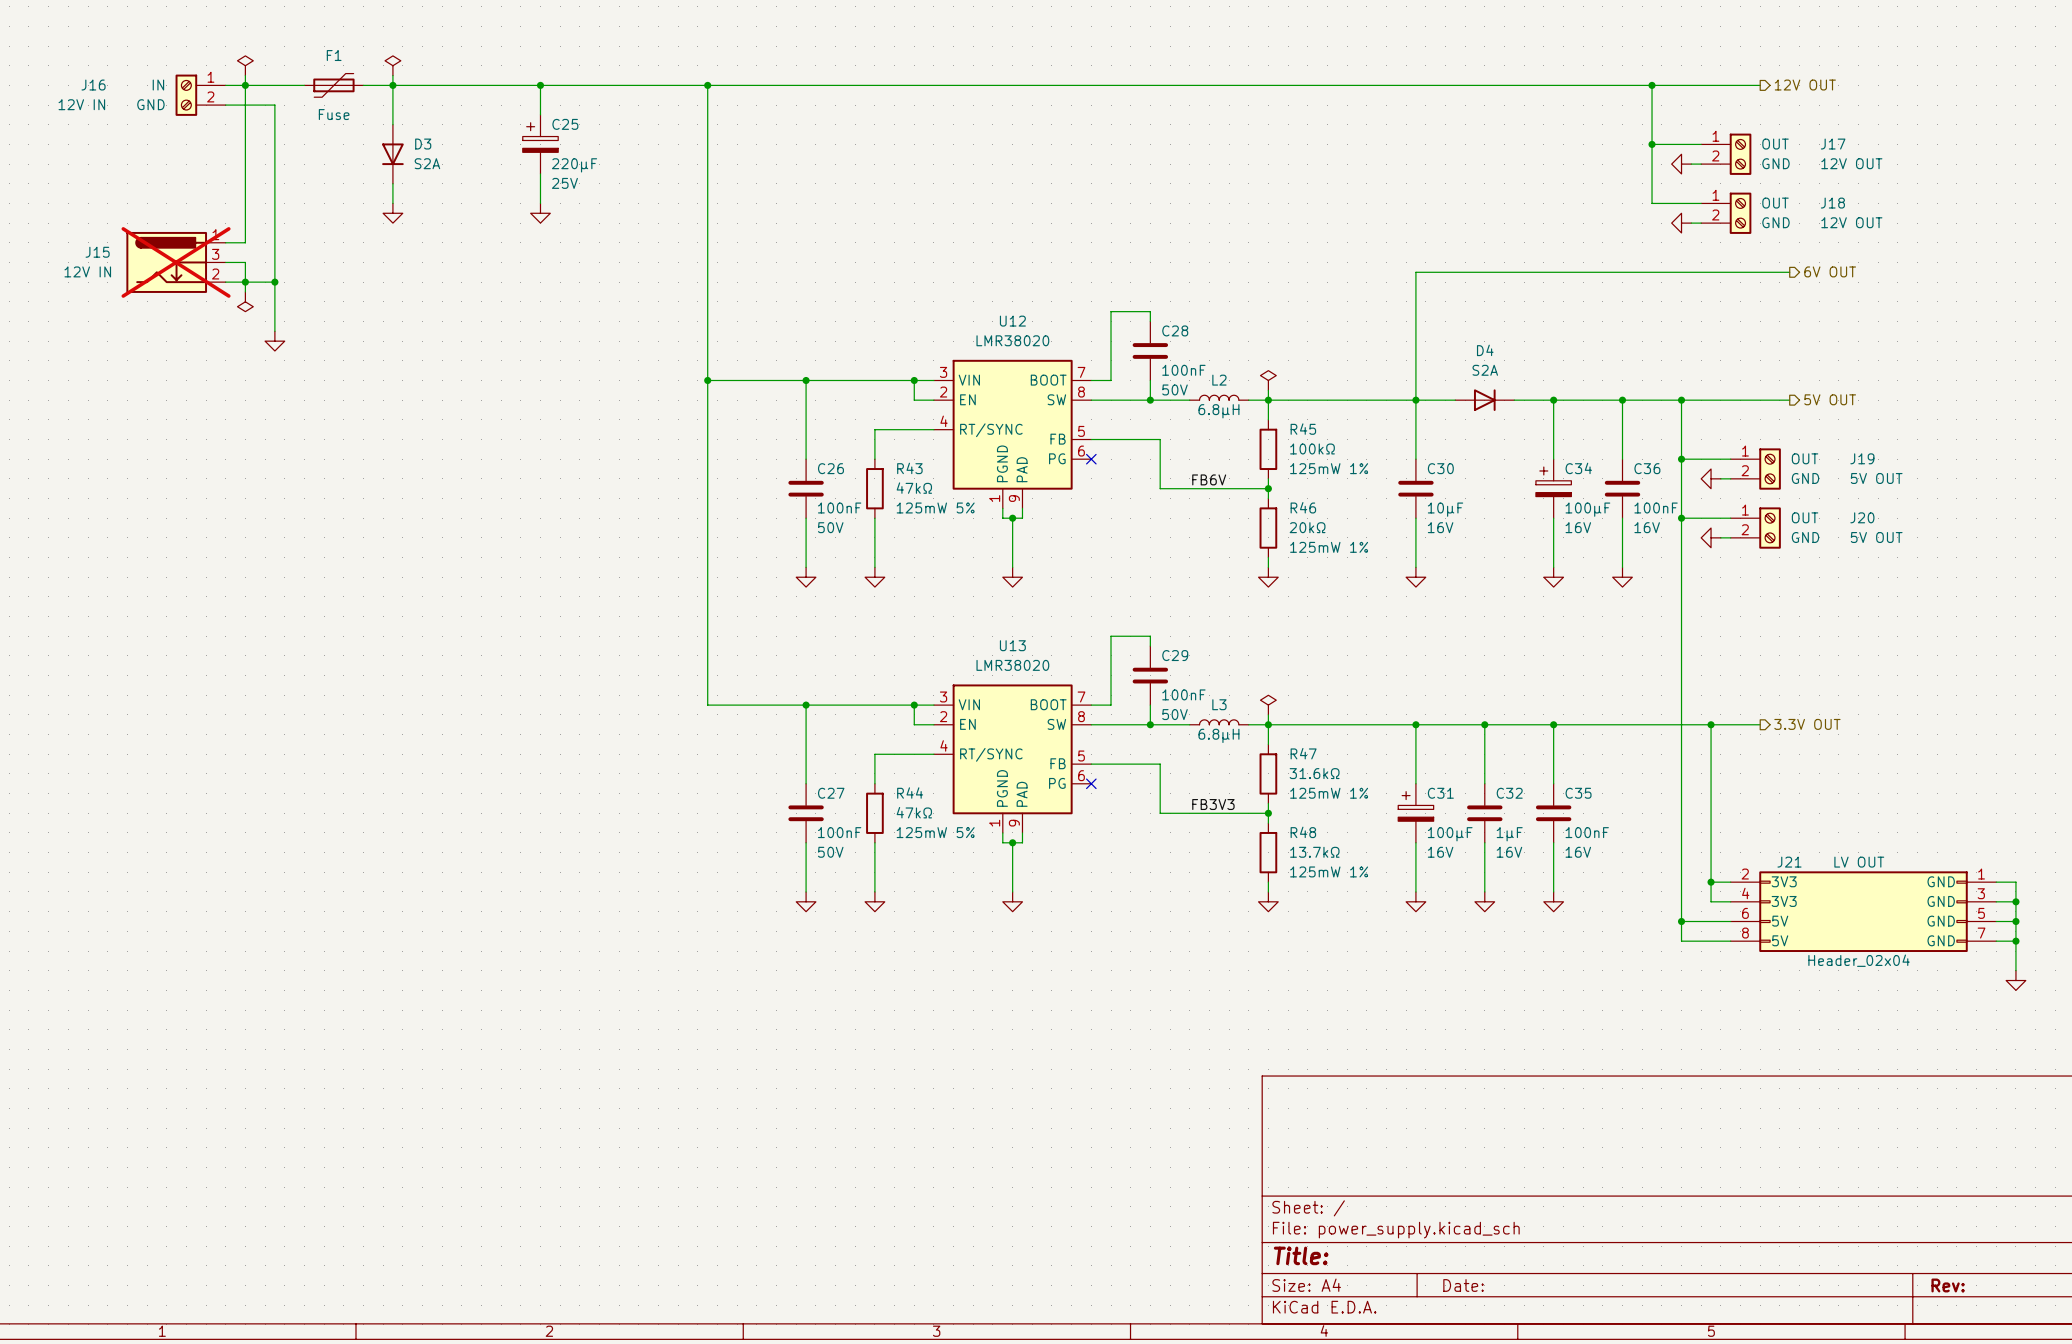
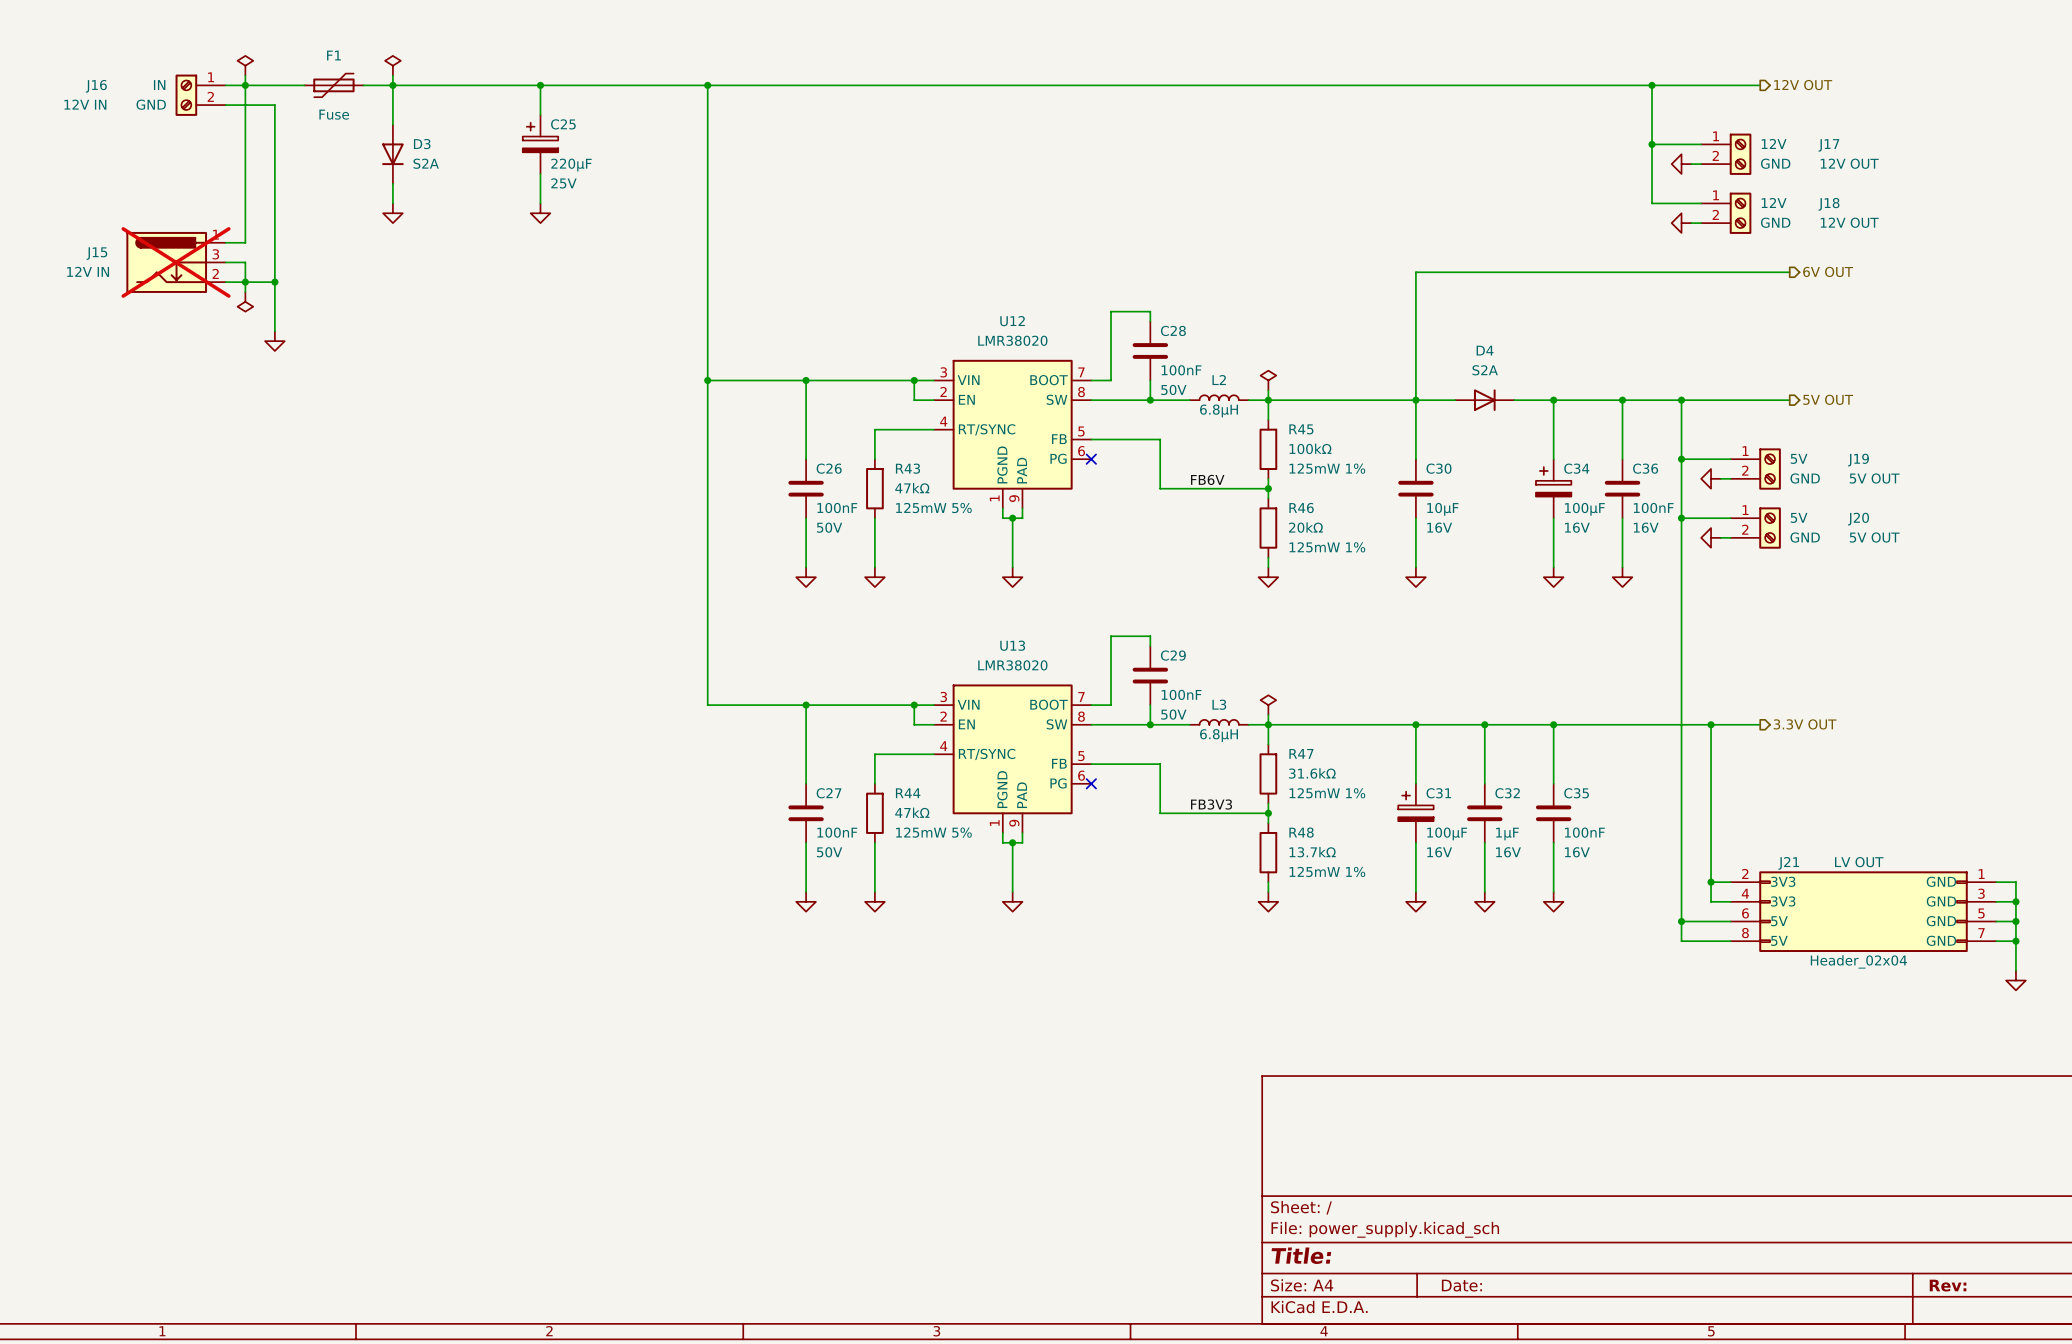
J17 text: OUT (1775, 144) -> 12V (1774, 143)
J18 text: OUT (1775, 203) -> 12V (1774, 202)
J19 text: OUT (1805, 458) -> 5V (1799, 458)
J20 text: OUT (1805, 517) -> 5V (1799, 517)

